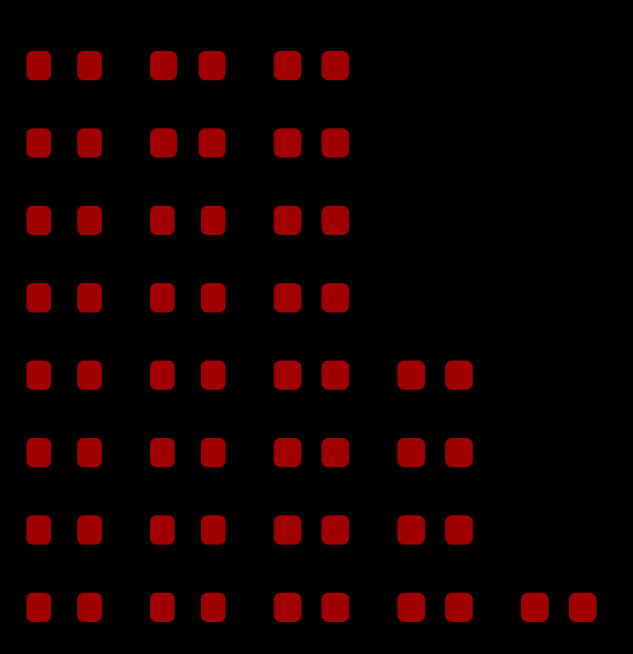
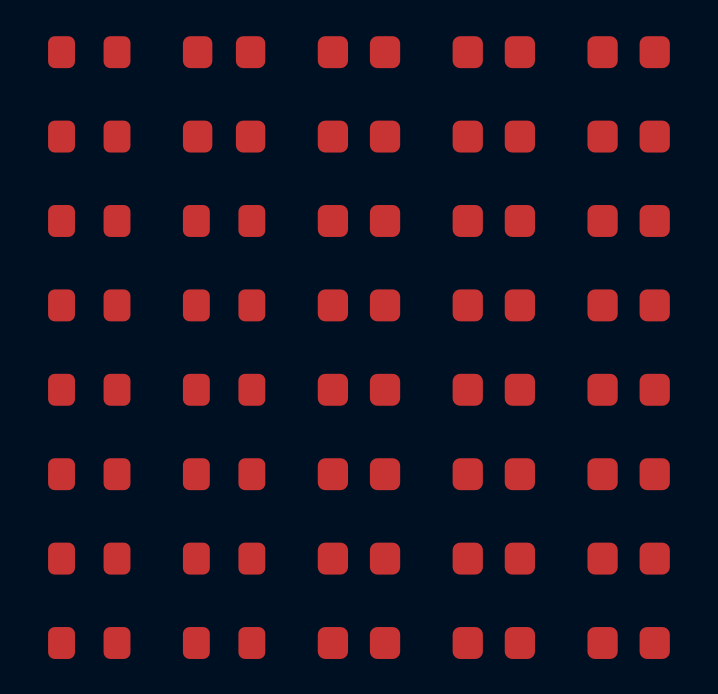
part: none -> (493, 52)
part: none -> (628, 52)
part: none -> (493, 136)
part: none -> (628, 136)
part: none -> (493, 220)
part: none -> (628, 220)
part: none -> (493, 305)
part: none -> (628, 305)
part: none -> (628, 389)
part: none -> (628, 474)
part: none -> (628, 558)

